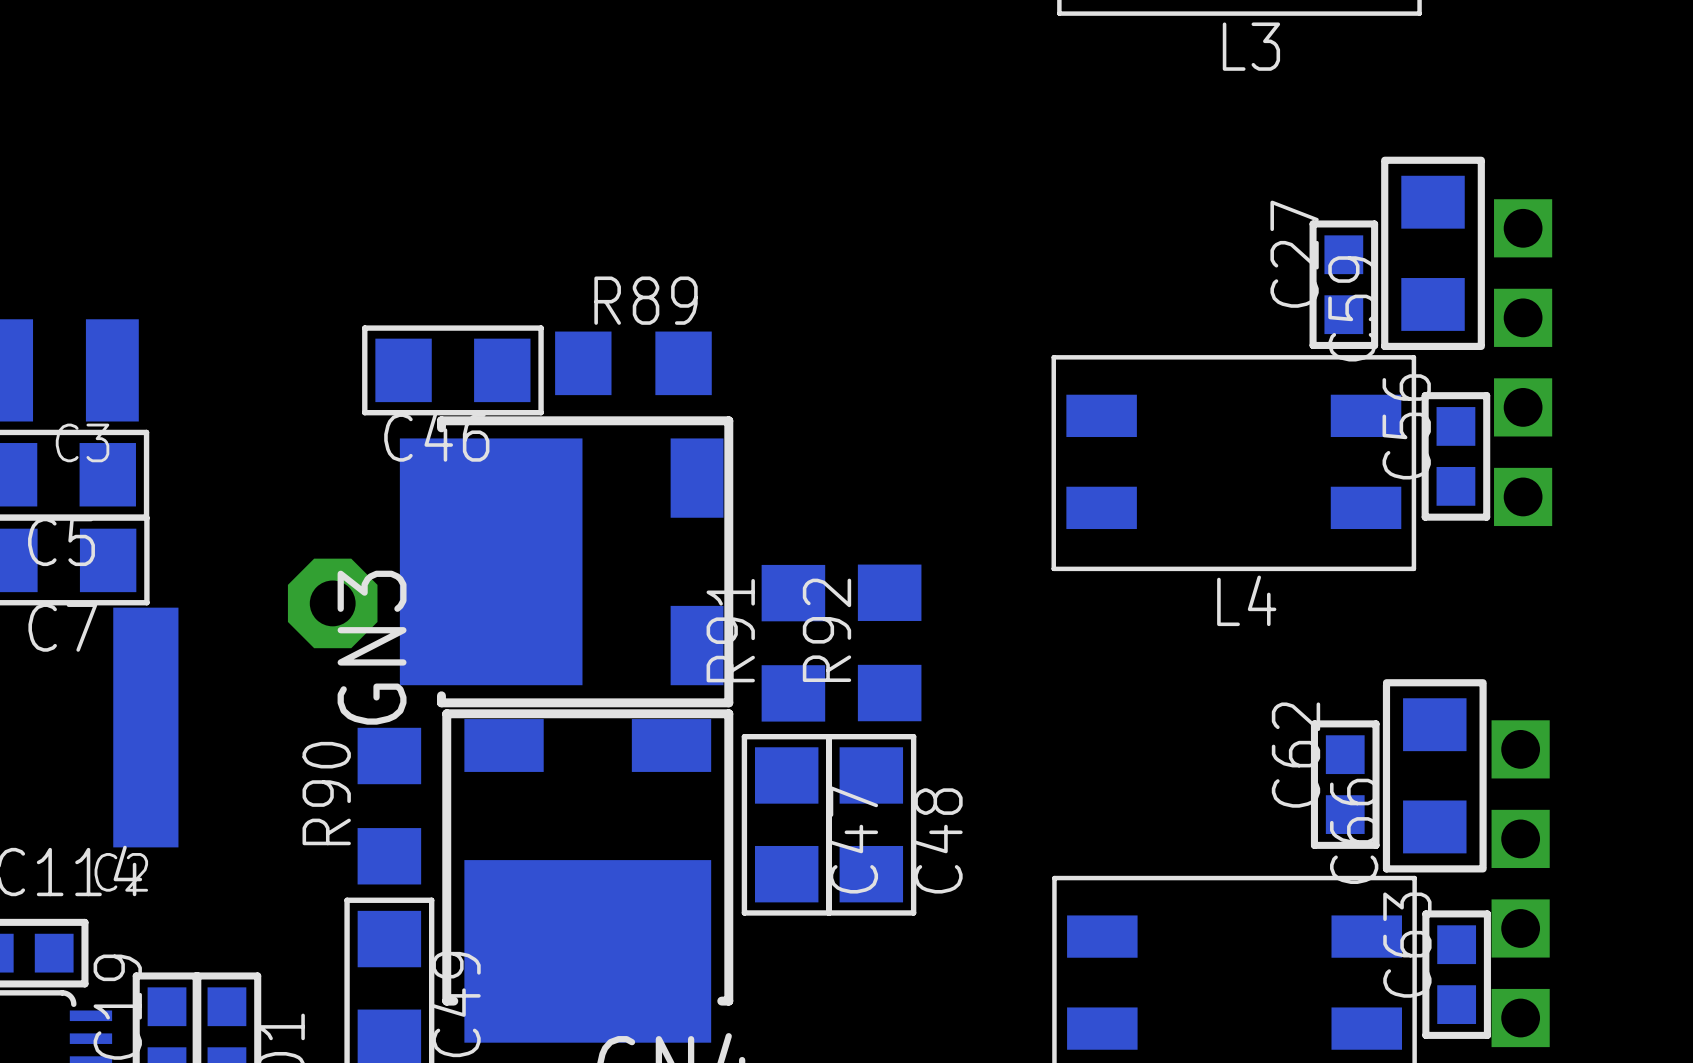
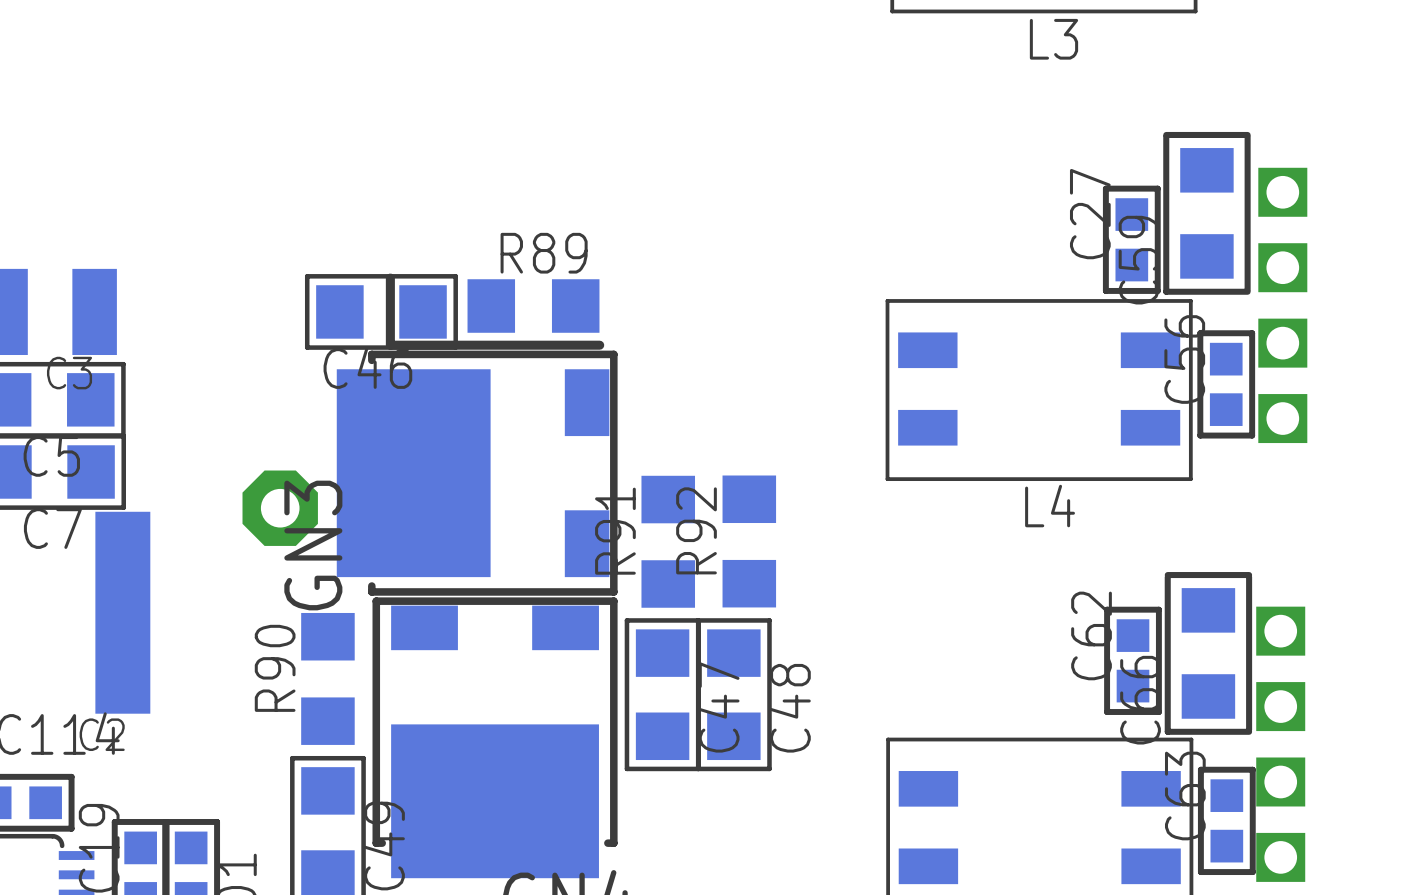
line: none -> (390, 278) (390, 345) (599, 345)

